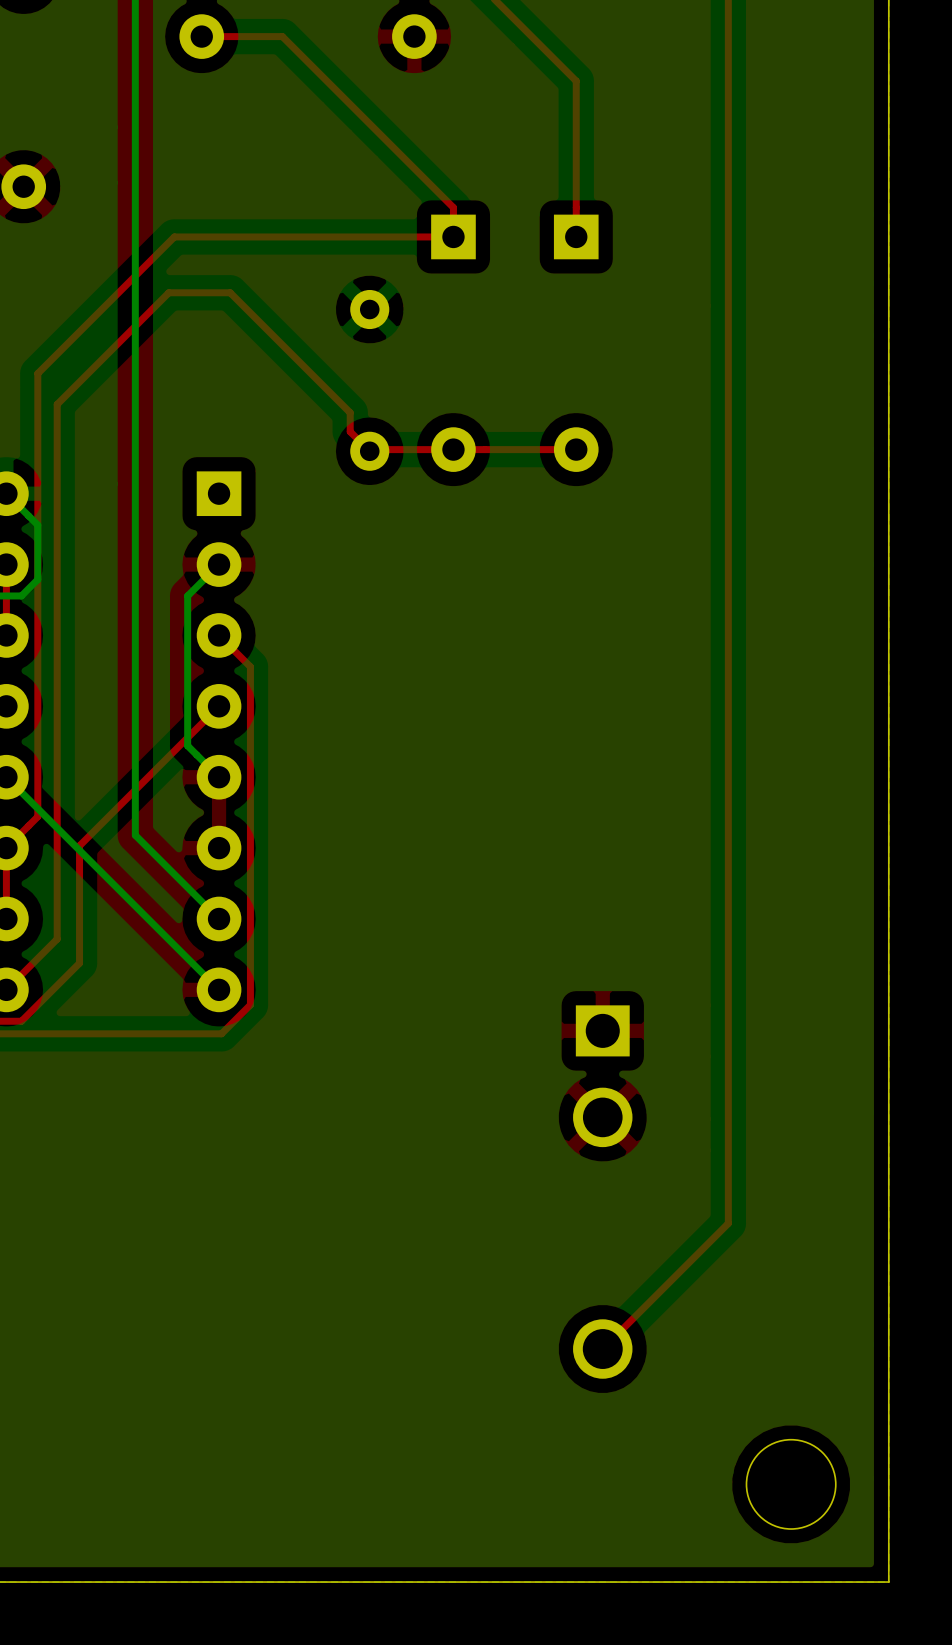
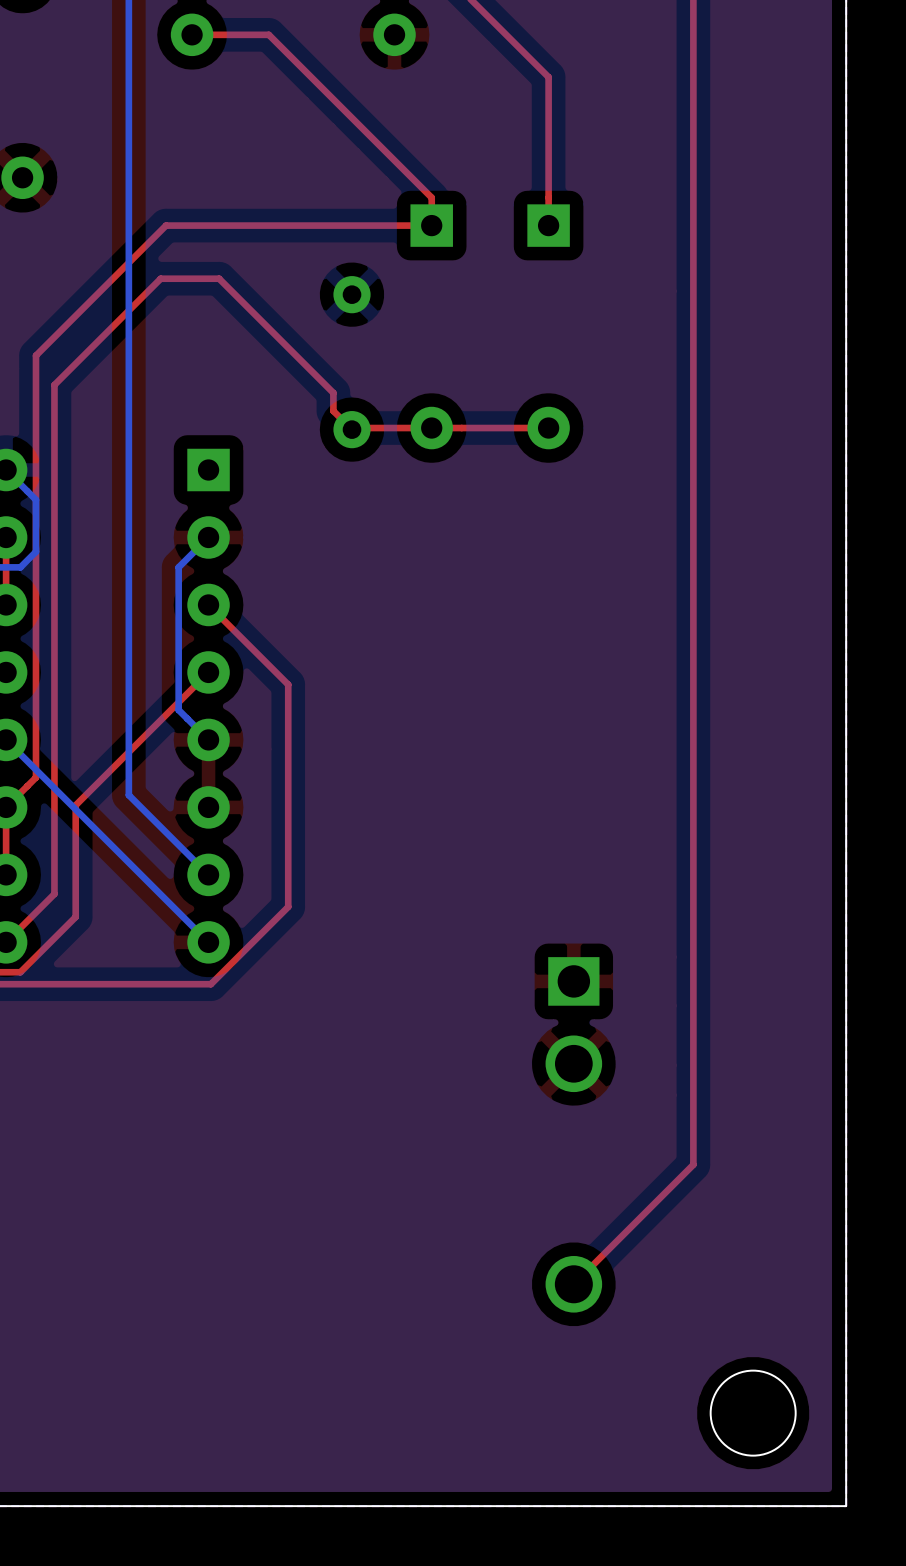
top track: (250, 666) (250, 1004) -> (238, 634) (288, 684) (288, 906) (238, 956)

